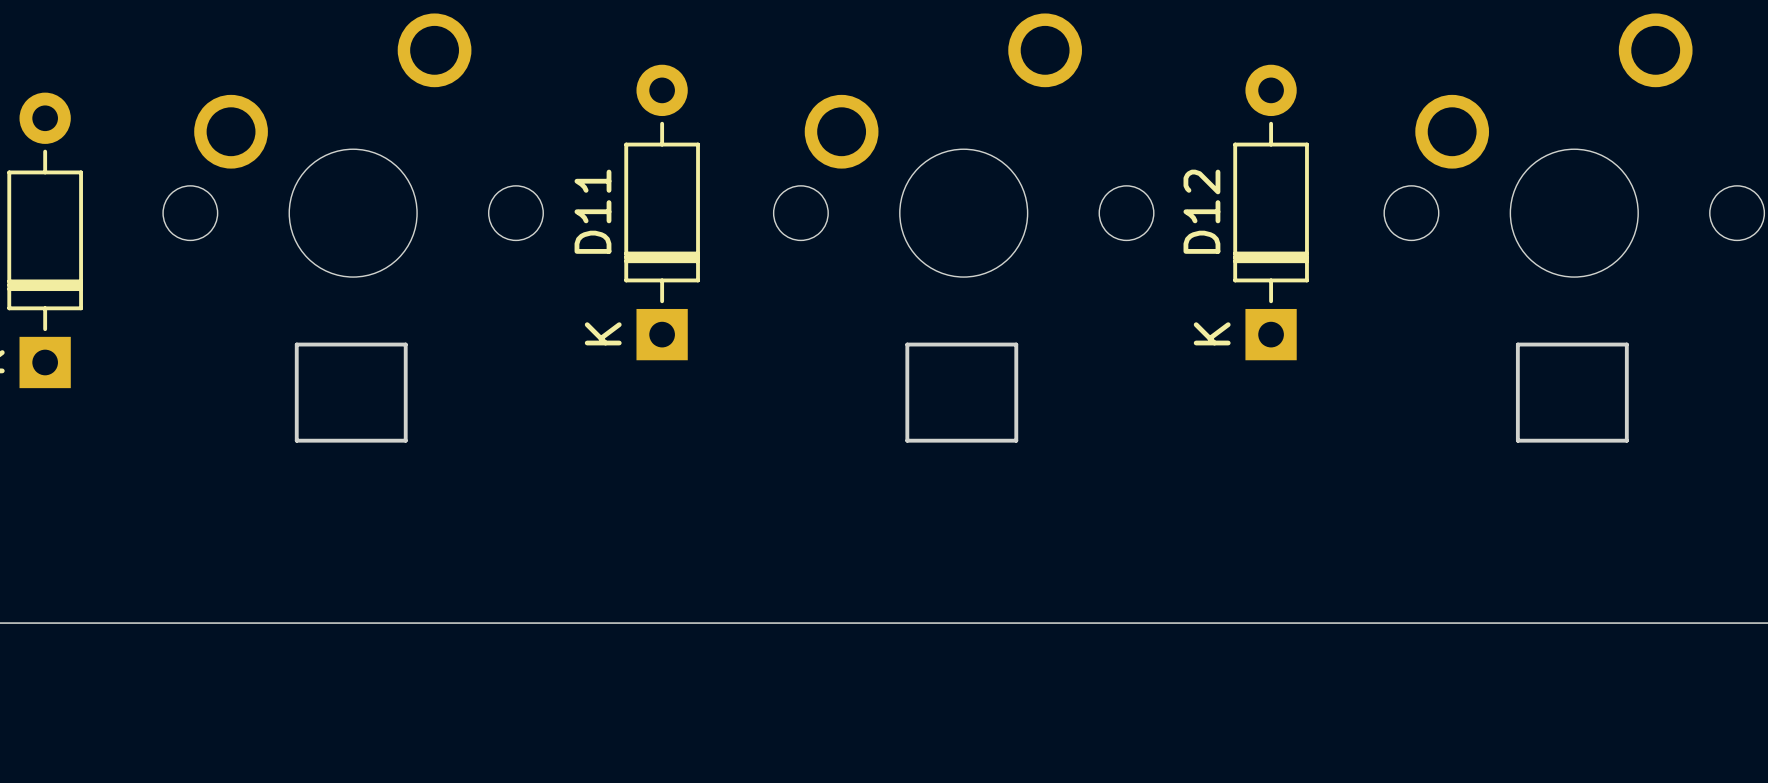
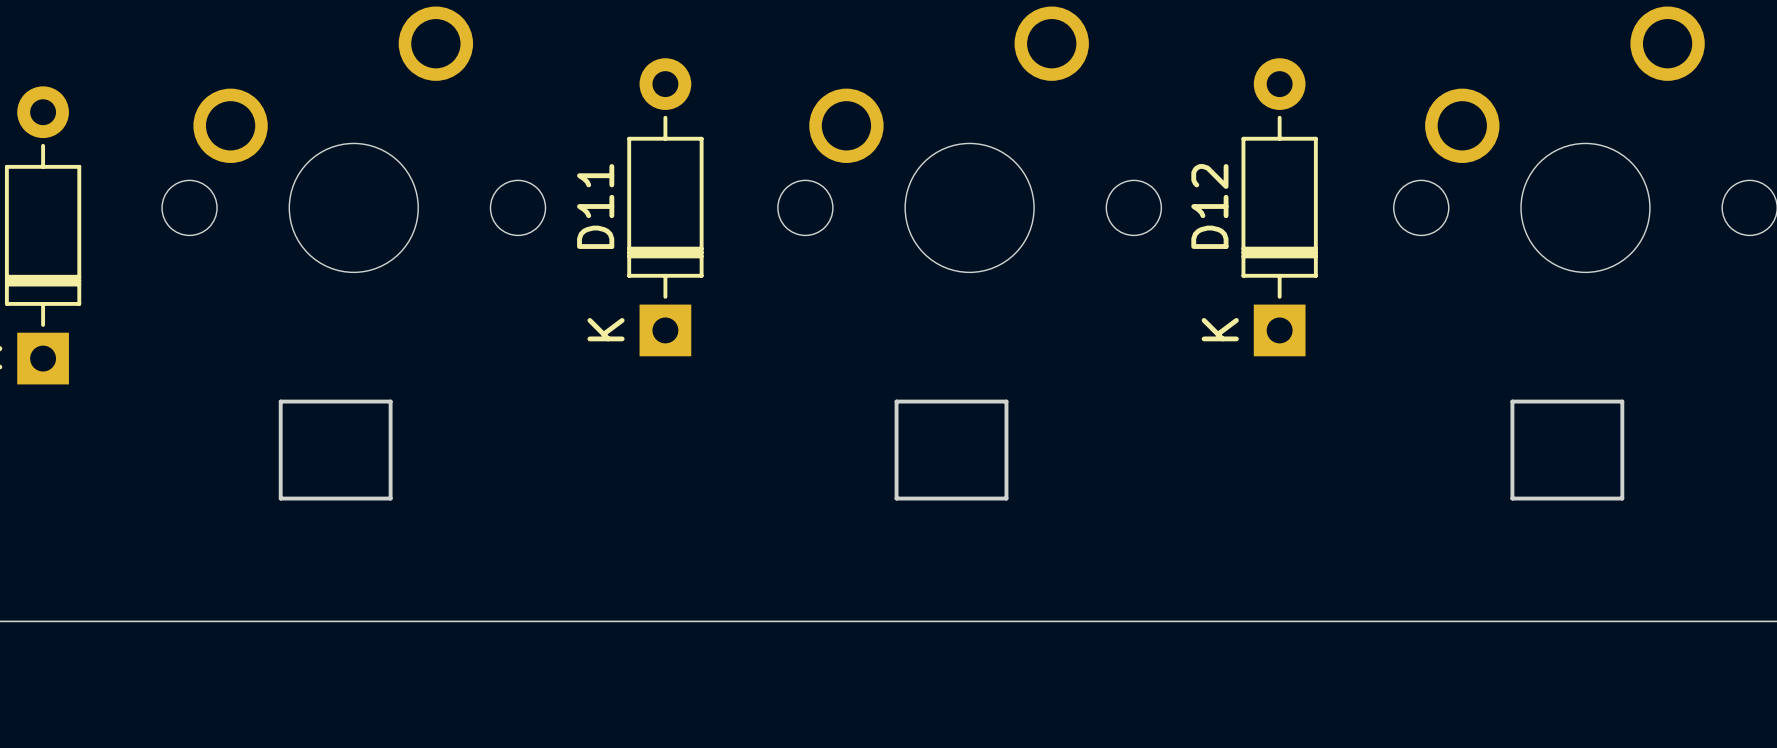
part position: (351, 392) -> (335, 450)
part position: (961, 392) -> (951, 450)
part position: (1572, 392) -> (1567, 450)

